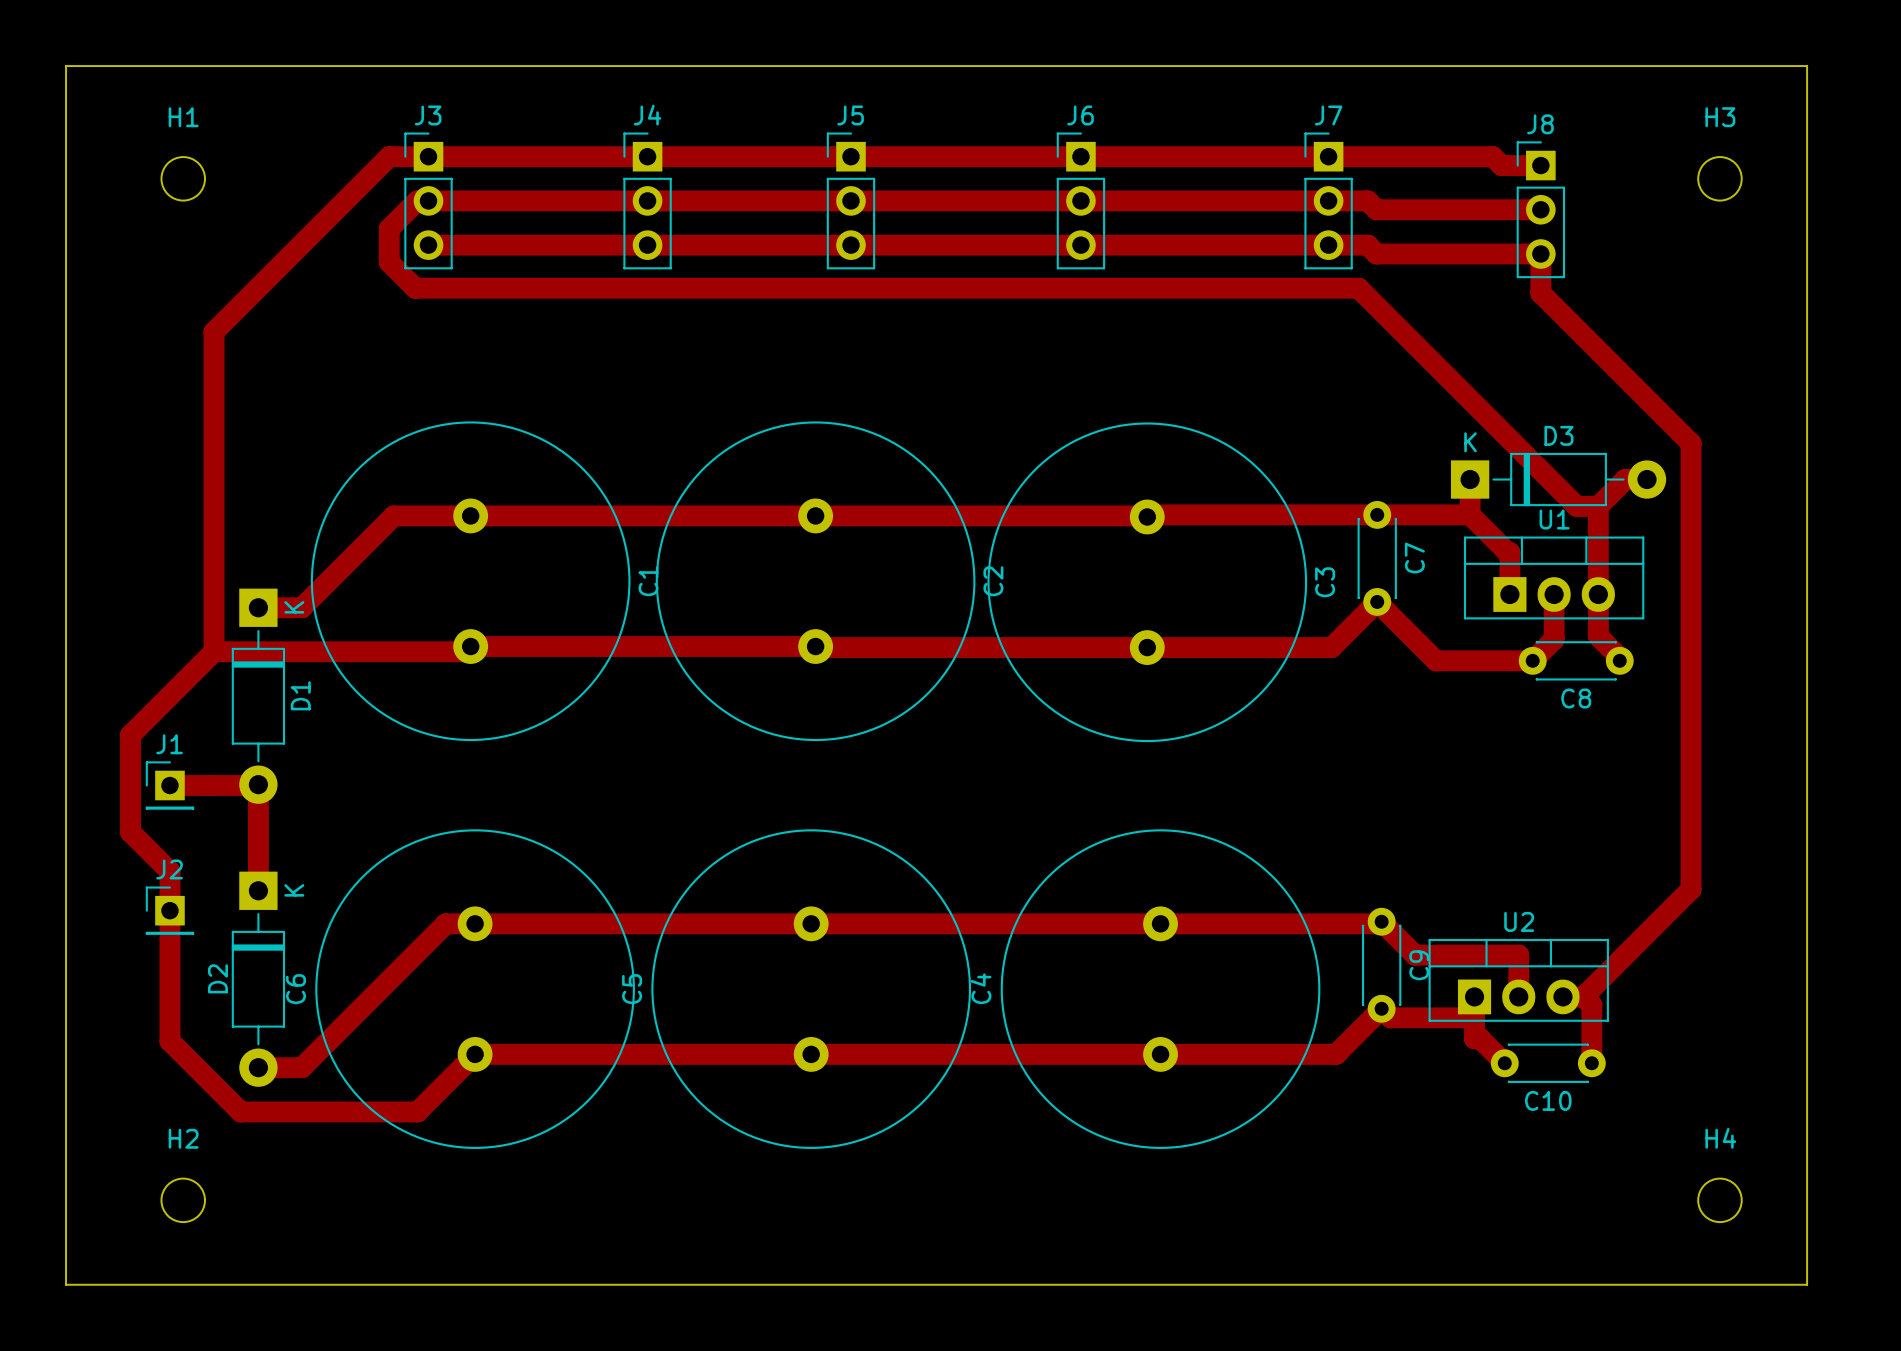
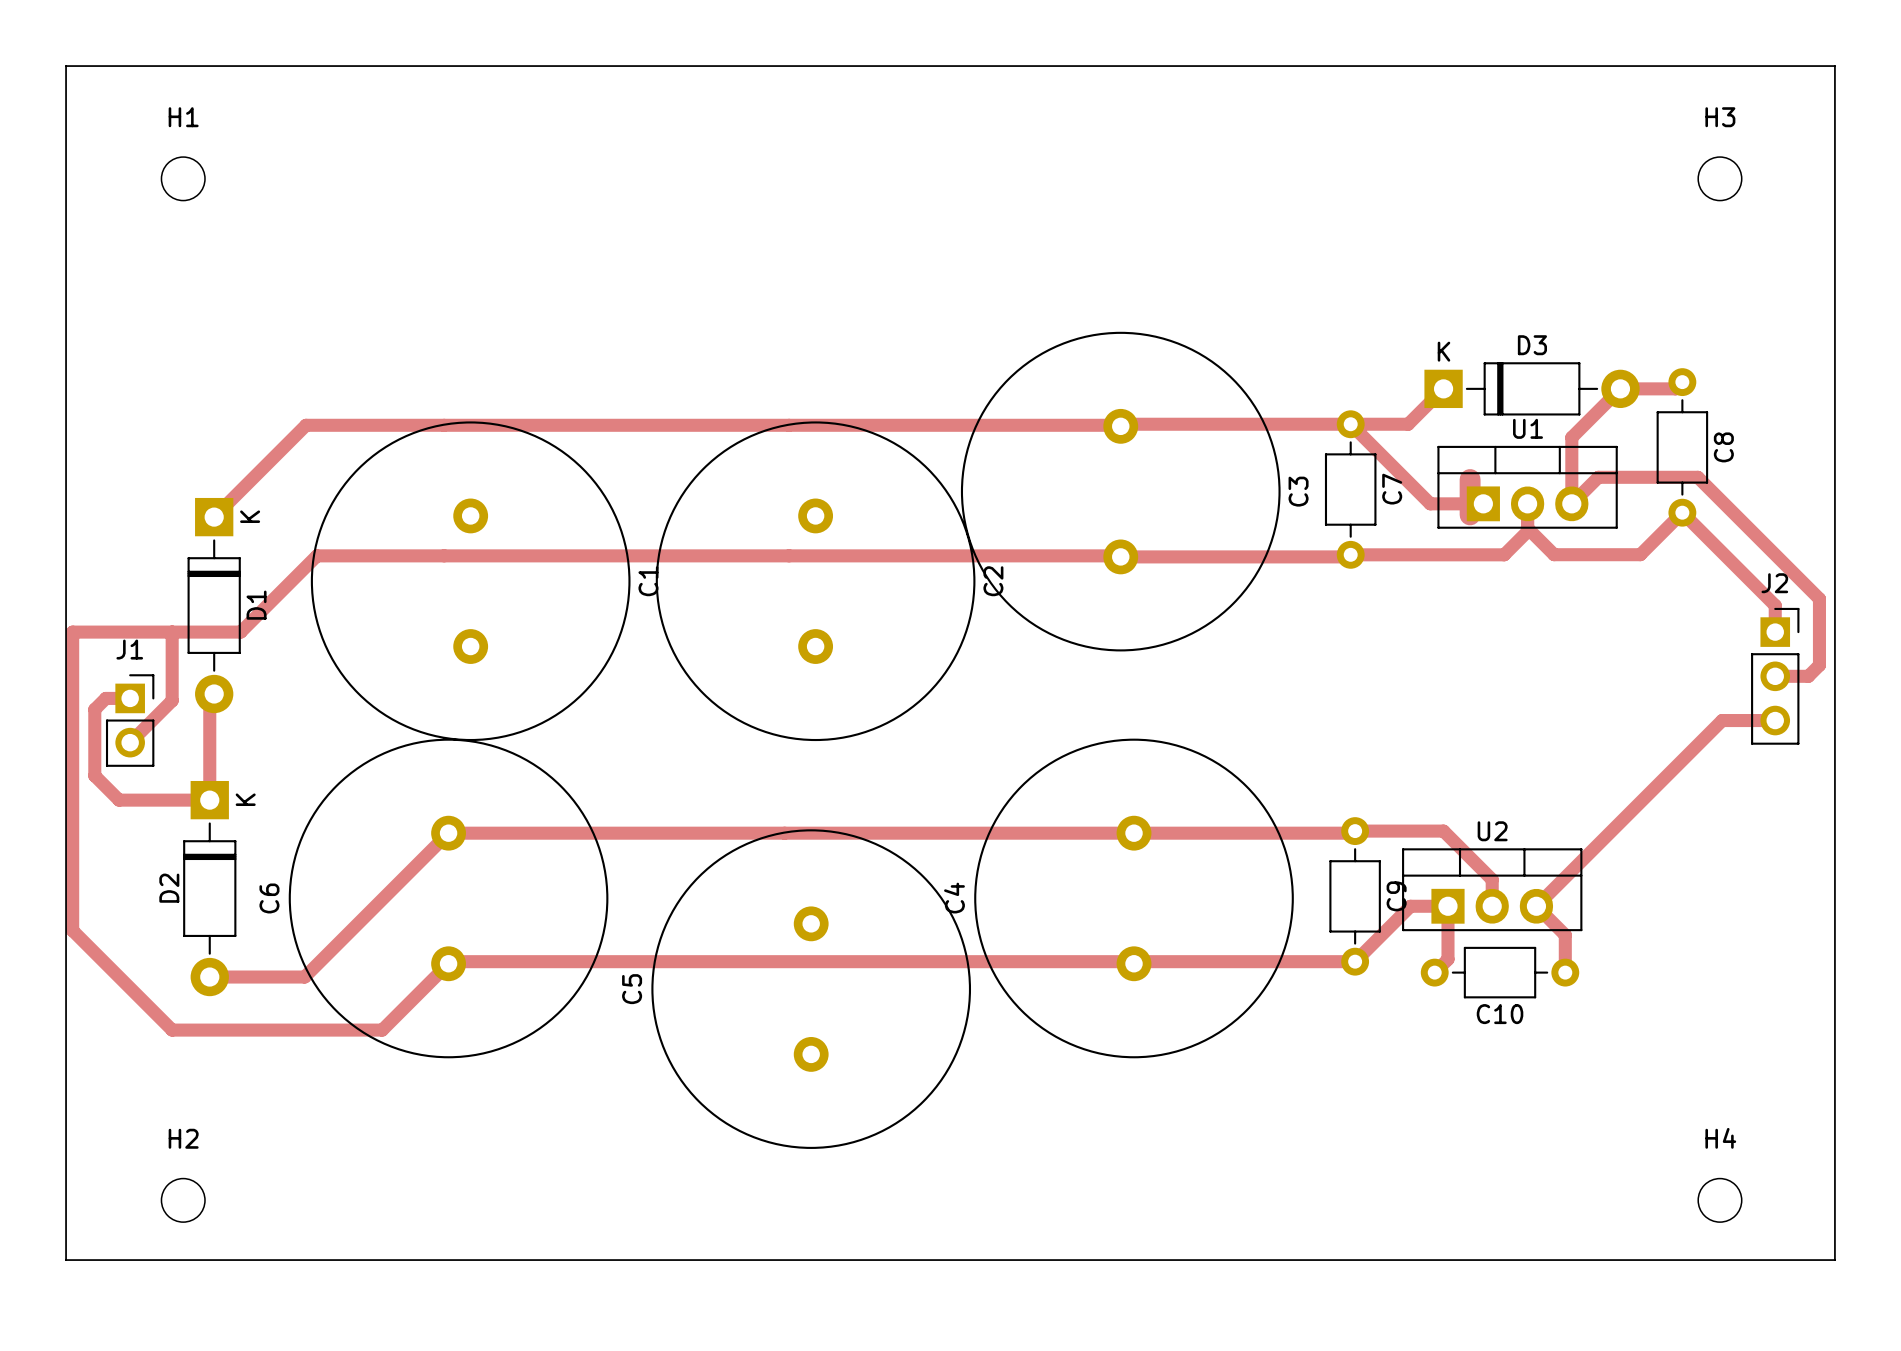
board edge: (1807, 66) (1807, 1284) (66, 1284) (66, 1260) -> (1807, 66) (1834, 66) (1834, 1260) (66, 1260)
track: (1540, 165) (1501, 165) (1492, 156) (389, 156) (214, 331) (214, 651) -> none
J3: (428, 200) -> none
J4: (647, 200) -> none
J5: (850, 200) -> none
J6: (1080, 200) -> none
J7: (1328, 200) -> none
track: (1540, 209) (1376, 209) (1367, 200) (417, 200) (389, 228) (389, 262) (415, 288) (1358, 288) (1576, 506) (1598, 506) -> none
J8: (1540, 209) -> none
track: (428, 245) (1367, 245) (1376, 253) (1540, 253) (1540, 293) (1691, 443) (1691, 889) (1583, 996) -> none
track: none -> (1682, 382) (1675, 388) (1620, 388) (1571, 437) (1571, 503) (1598, 477) (1697, 477) (1819, 598) (1819, 665) (1808, 676) (1775, 676)
track: none -> (1443, 388) (1408, 424) (1122, 424) (1120, 426) (306, 425) (214, 517)
track: none -> (1350, 424) (1430, 503) (1483, 503)
D3 position: (1558, 479) -> (1532, 388)
track: (1646, 479) (1625, 479) (1598, 506) -> none
C7 footprint: [1357, 500, 1397, 616] -> [1324, 410, 1377, 569]
track: none -> (1527, 503) (1527, 531) (1504, 554) (1350, 554) (1348, 556) (316, 555) (240, 632) (72, 632) (72, 930) (172, 1030) (382, 1030) (450, 961) (1355, 961) (1410, 906) (1447, 906) (1447, 959) (1434, 972)
track: (1598, 506) (1598, 636) (1619, 657) (1619, 660) -> none
track: none -> (1527, 528) (1554, 554) (1640, 554) (1682, 512) (1775, 605) (1775, 632)
U1 position: (1554, 577) -> (1527, 487)
C3 position: (1147, 582) -> (1120, 491)
track: (1509, 594) (1509, 552) (1470, 514) (1149, 514) (1147, 516) (393, 515) (301, 607) (258, 607) -> none
track: (1554, 594) (1554, 639) (1532, 660) (1436, 660) (1377, 601) (1331, 647) (470, 646) (465, 651) (214, 651) -> none
track: none -> (172, 632) (172, 700) (130, 742)
C8 footprint: [1518, 641, 1634, 681] -> [1656, 368, 1709, 527]
track: (214, 651) (130, 735) (130, 832) (169, 871) (169, 1041) (240, 1111) (417, 1111) (475, 1054) (1336, 1054) (1381, 1008) (1390, 1017) (1474, 1017) -> none
track: none -> (214, 694) (209, 698) (209, 800) (119, 800) (94, 775) (94, 709) (105, 698) (130, 698)
D1 position: (258, 696) -> (214, 605)
C8 name position: C8 (1576, 698) -> C8 (1723, 447)
track: none -> (1775, 720) (1722, 720) (1536, 906) (1565, 935) (1565, 972)
J1 footprint: [145, 761, 195, 810] -> [105, 674, 155, 767]
track: (258, 784) (258, 890) -> none
track: (169, 785) (258, 785) -> none
J2 name position: J2 (169, 869) -> J2 (1774, 583)
J2 footprint: [145, 886, 195, 935] -> [1751, 607, 1800, 745]
track: none -> (1492, 906) (1492, 879) (1443, 831) (1355, 831) (1353, 833) (448, 833) (304, 977) (209, 977)
C9 footprint: [1361, 907, 1402, 1023] -> [1329, 817, 1381, 976]
D2 position: (258, 979) -> (209, 888)
U2 position: (1518, 980) -> (1492, 889)
C6 position: (475, 989) -> (448, 898)
C4 position: (1160, 989) -> (1134, 898)
track: (1474, 996) (1474, 1038) (1480, 1038) (1504, 1063) -> none
track: (1518, 996) (1518, 955) (1415, 955) (1381, 921) (1379, 923) (445, 923) (301, 1067) (258, 1067) -> none
track: (1583, 996) (1591, 1005) (1591, 1063) -> none
C10 footprint: [1490, 1043, 1606, 1083] -> [1420, 946, 1580, 999]

